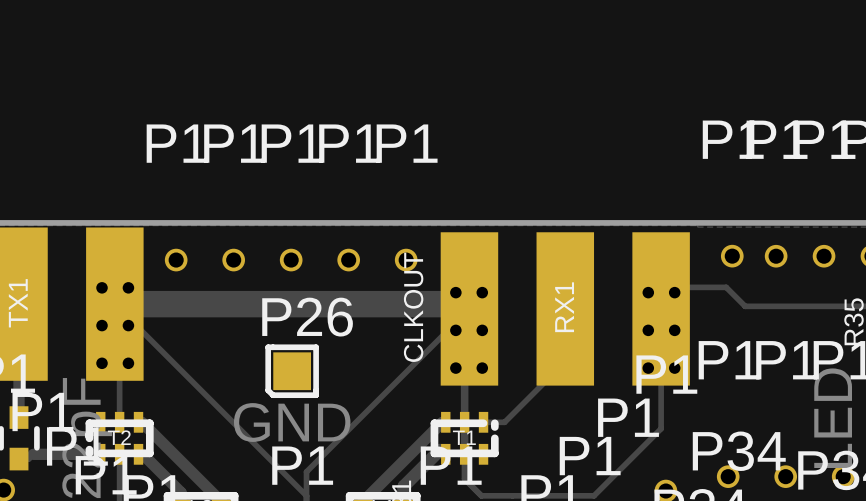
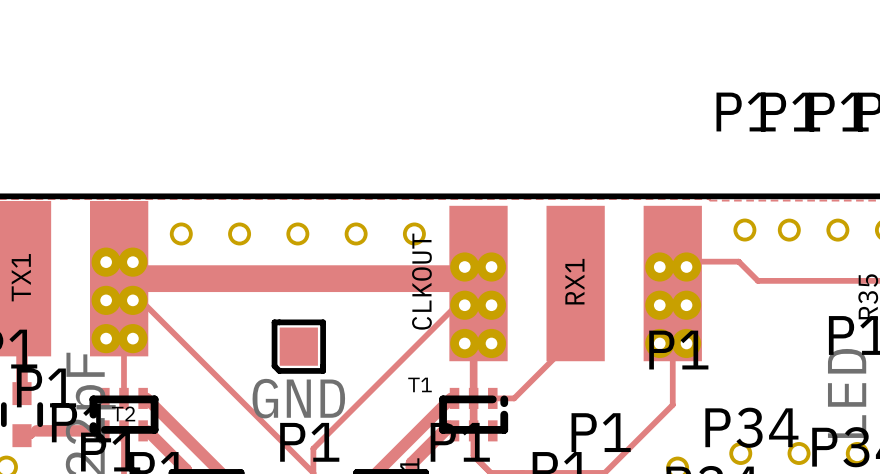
P1 name: P1 (177, 143) -> none
P1 name: P1 (234, 143) -> none
P1 name: P1 (292, 143) -> none
P1 name: P1 (349, 143) -> none
P1 name: P1 (407, 143) -> none
P26 name: P26 (307, 317) -> none
P1 name: P1 (729, 360) -> none
P1 name: P1 (786, 360) -> none
P1 name: P1 (628, 417) -> none
T1 name position: T1 (464, 437) -> T1 (420, 384)

